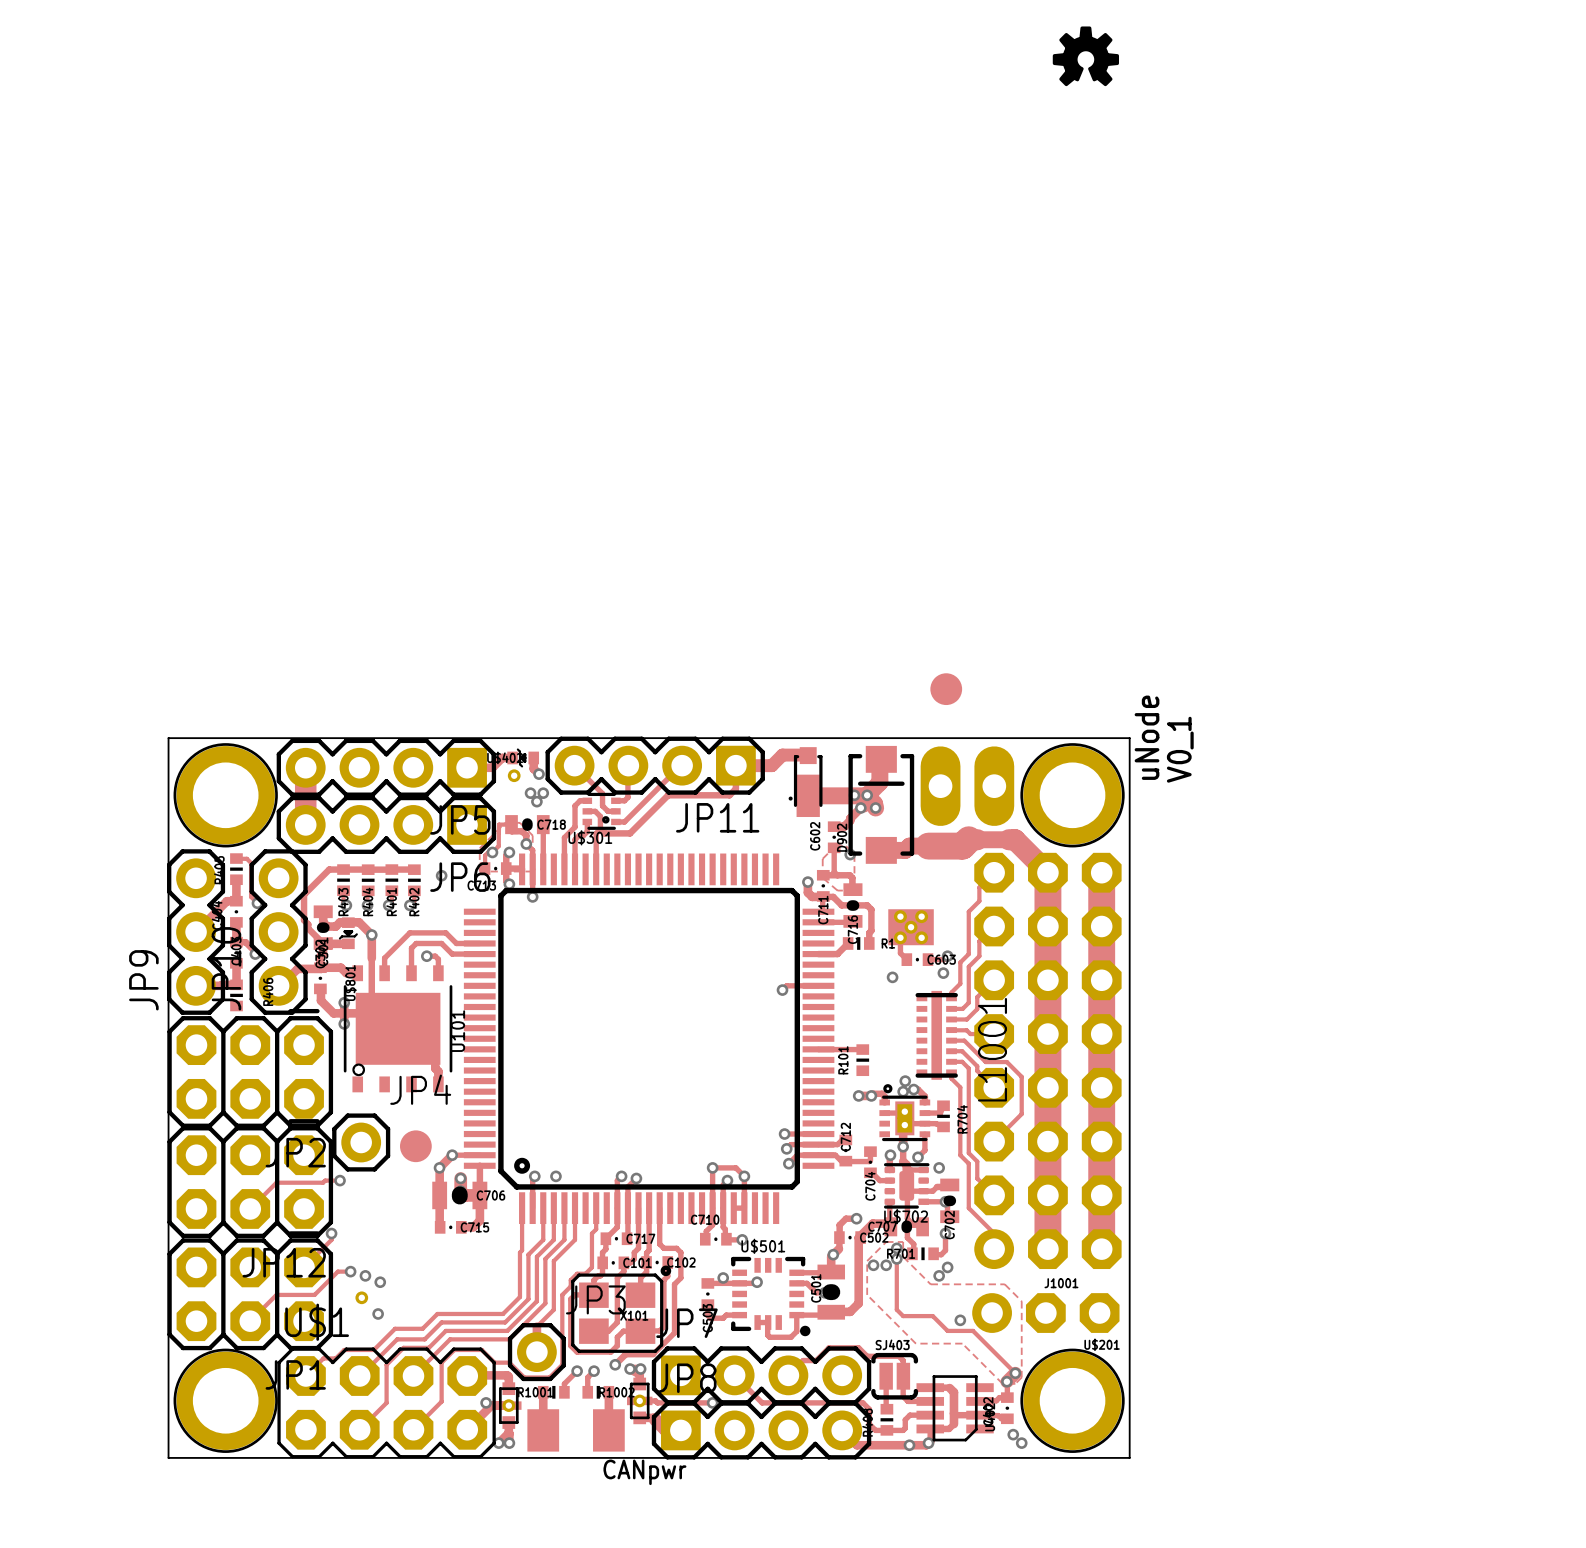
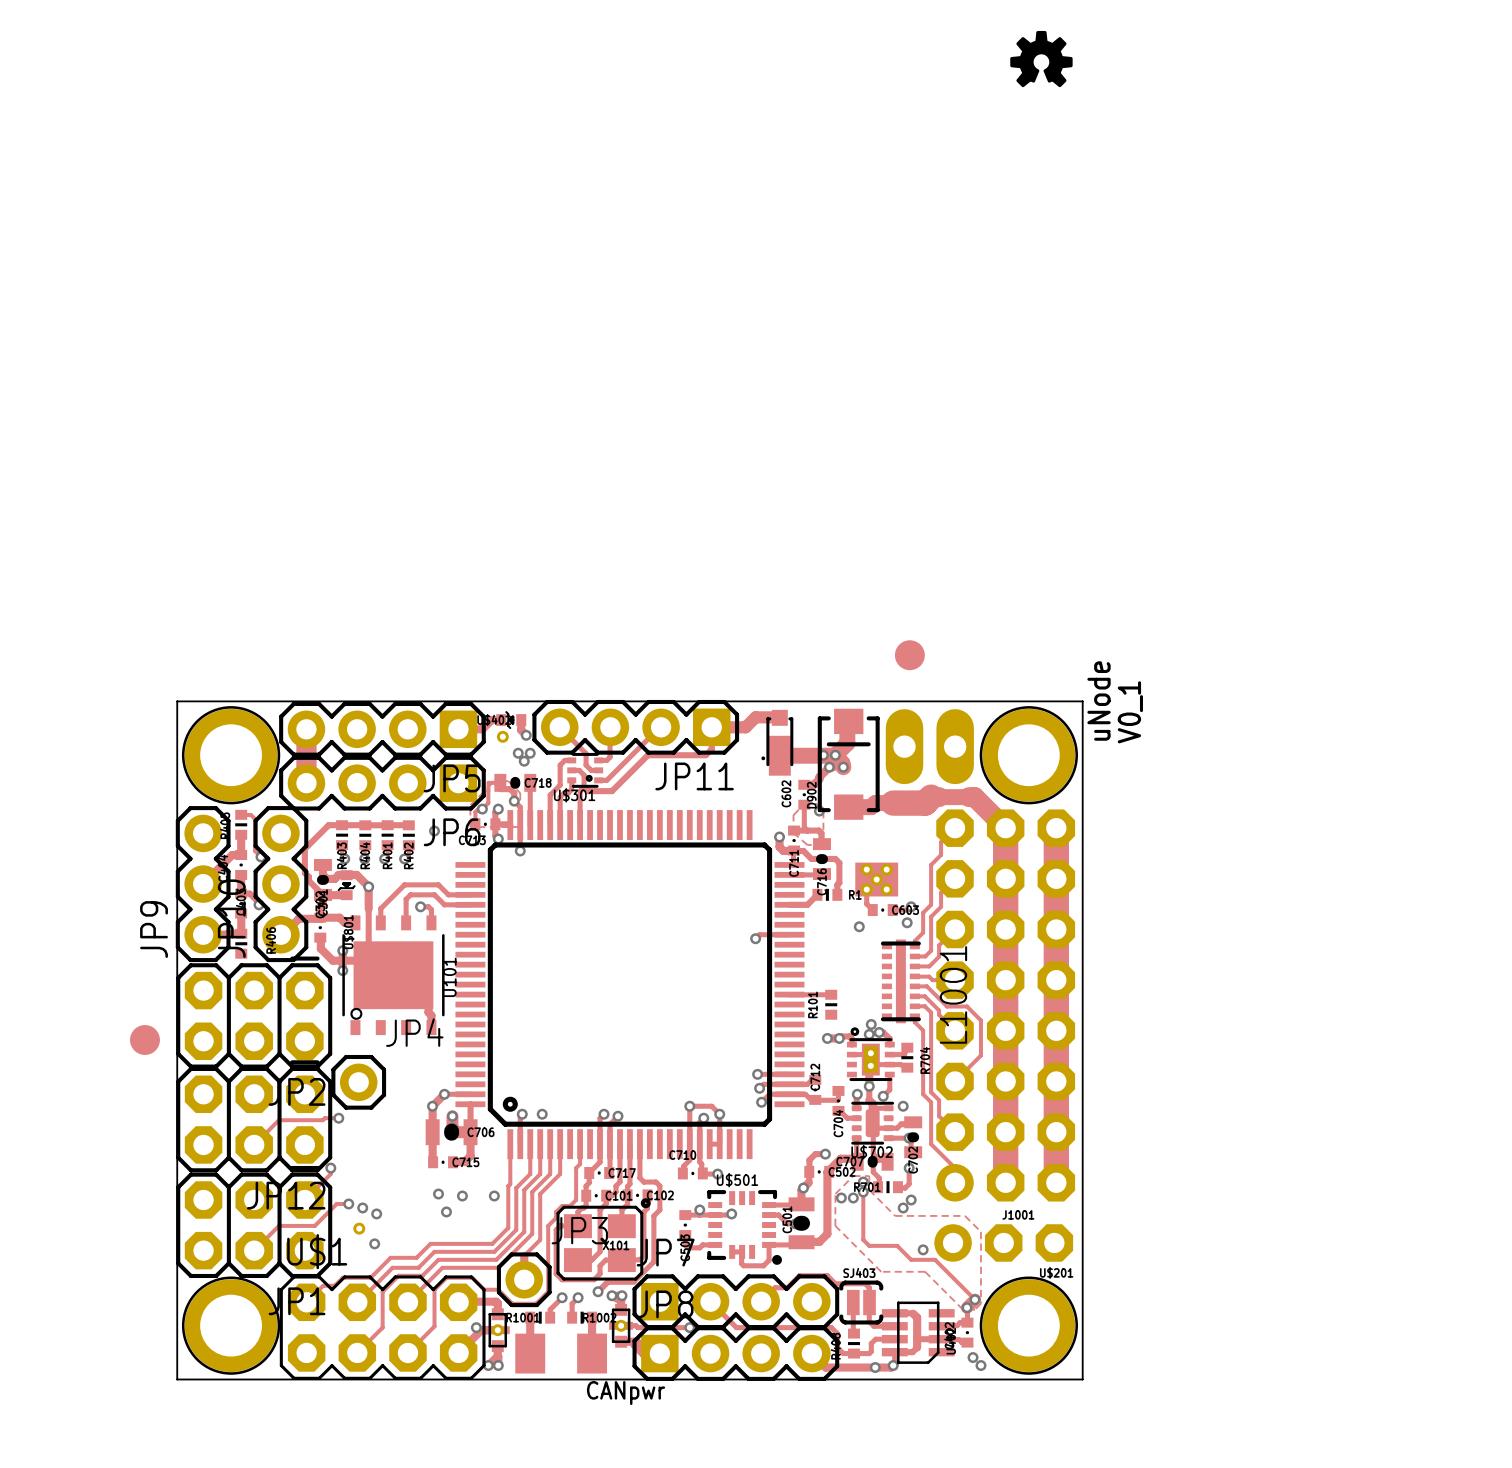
part position: (415, 1146) -> (144, 1040)
via: none -> (438, 1194)
via: none -> (462, 1196)
via: none -> (494, 1196)
via: none -> (446, 1211)

